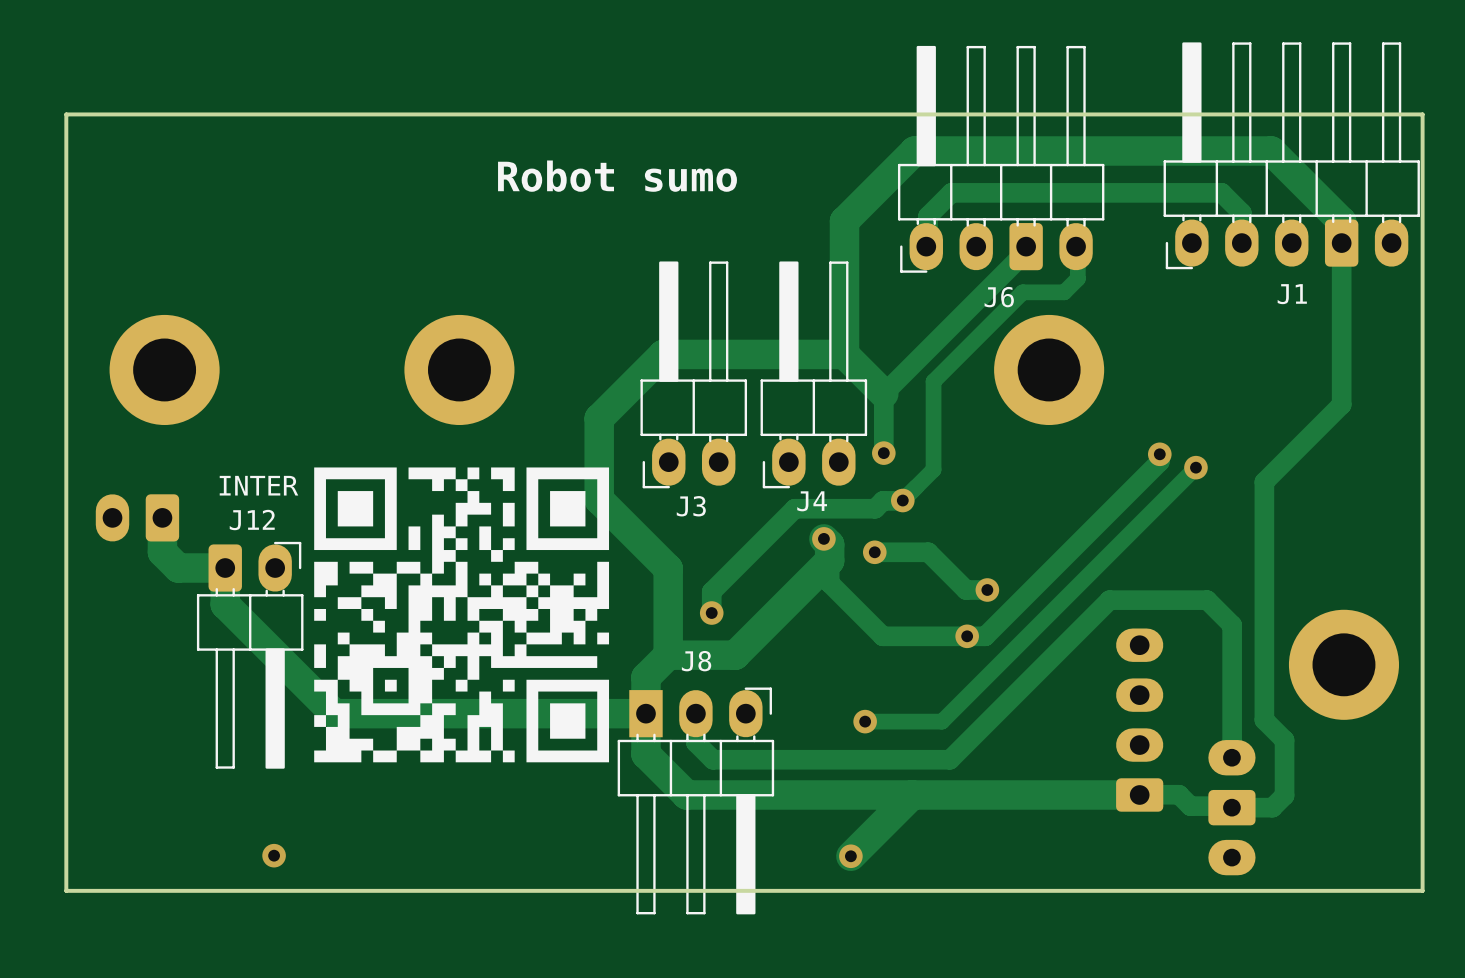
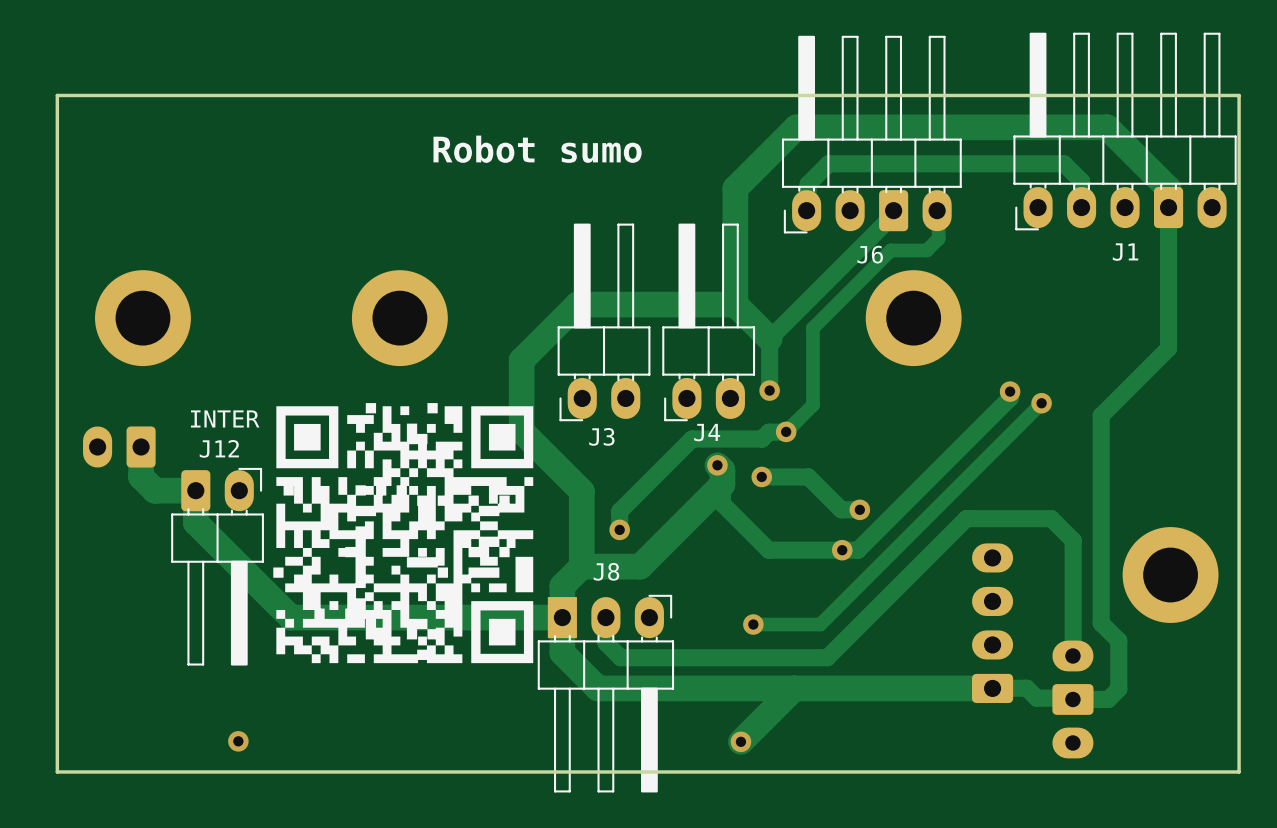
drawing: [314, 467, 610, 763] -> none
drawing: none -> [276, 406, 534, 664]
drawing shape: [314, 561, 326, 574] -> [276, 477, 286, 486]
drawing shape: [420, 632, 433, 645] -> [364, 556, 374, 566]
drawing shape: [491, 656, 503, 668] -> [426, 574, 436, 584]
drawing shape: [491, 715, 503, 727] -> [435, 627, 445, 637]
drawing shape: [526, 750, 539, 763] -> [453, 654, 463, 664]

